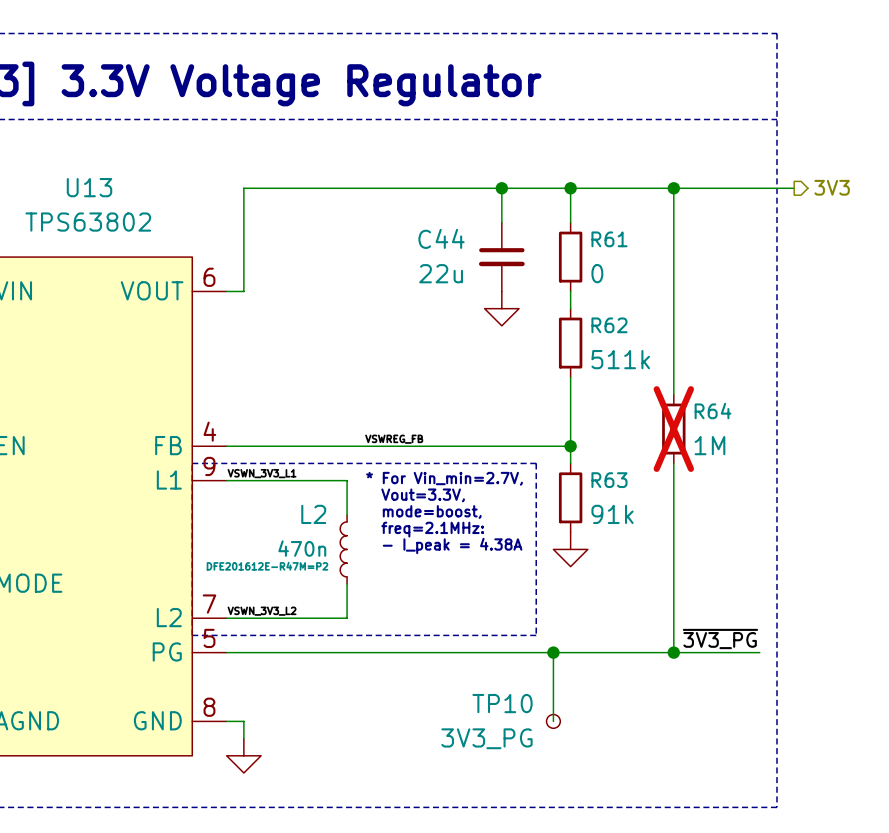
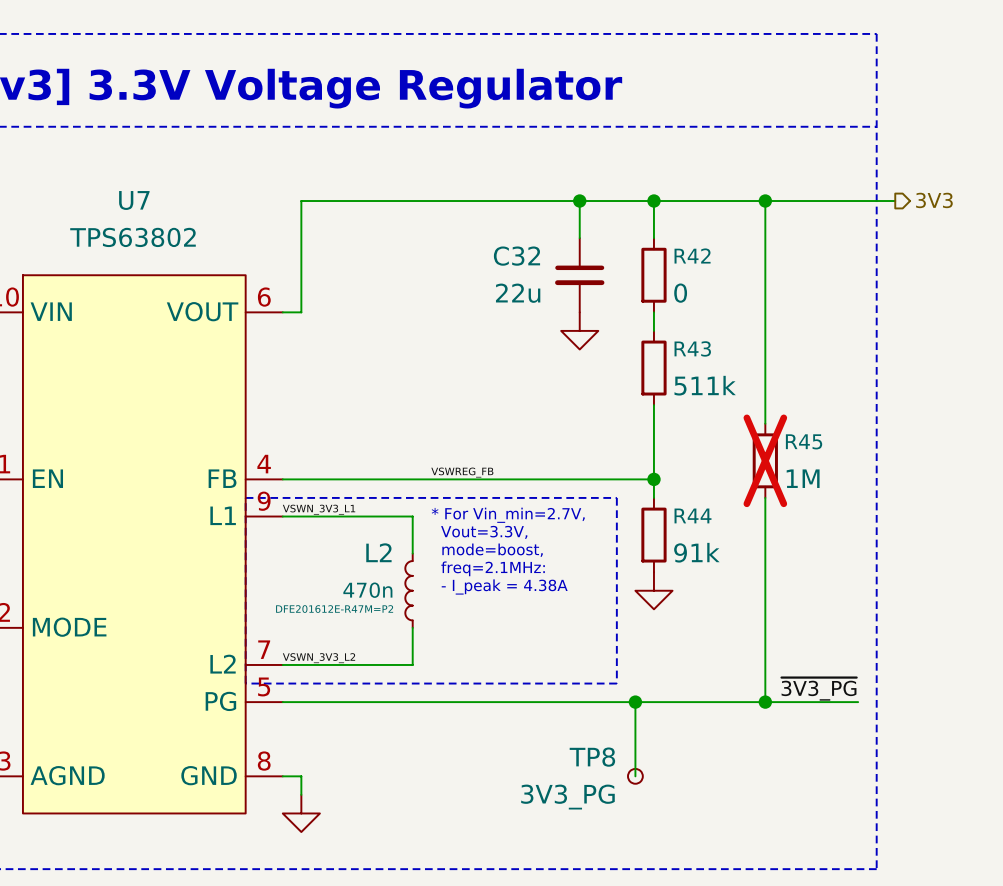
U13 name: U13 (89, 187) -> U7 (134, 200)
C44 name: C44 (441, 238) -> C32 (516, 256)
R61 name: R61 (609, 239) -> R42 (692, 255)
R62 name: R62 (609, 325) -> R43 (692, 348)
R64 name: R64 (713, 411) -> R45 (804, 441)
R63 name: R63 (609, 480) -> R44 (693, 515)
TP10 name: TP10 (502, 703) -> TP8 (592, 757)

